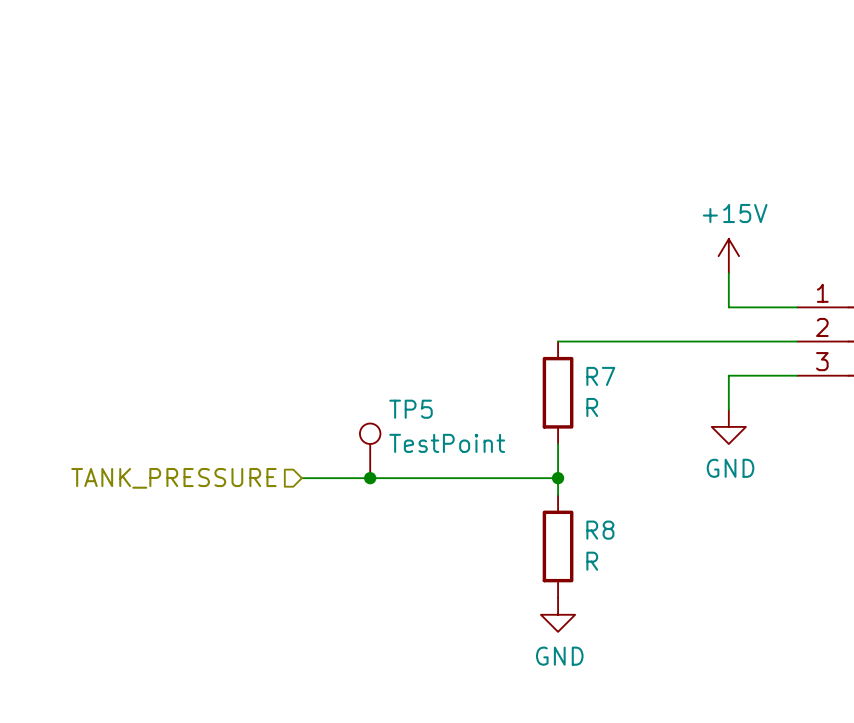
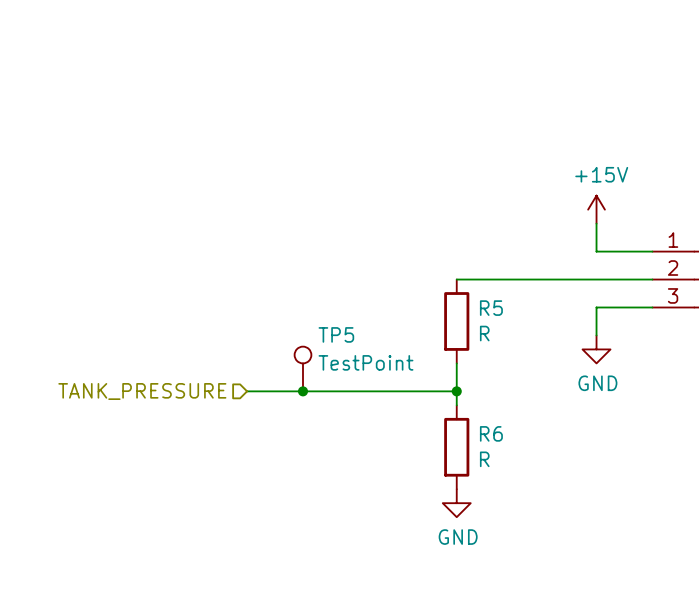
R7 name: R7 (600, 376) -> R5 (491, 308)
R8 name: R8 (600, 530) -> R6 (491, 433)

